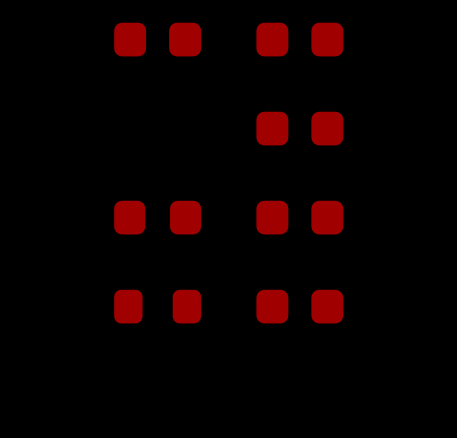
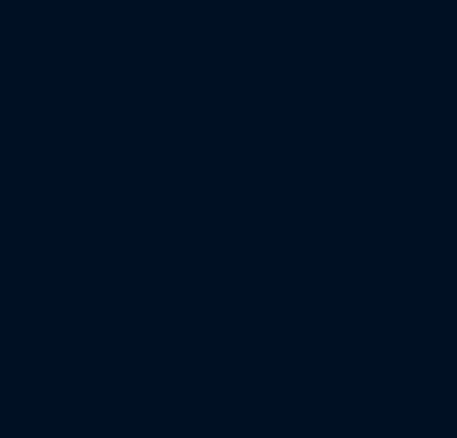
part: (157, 39) -> none
part: (299, 39) -> none
part: (299, 128) -> none
part: (157, 217) -> none
part: (299, 217) -> none
part: (157, 306) -> none
part: (299, 306) -> none

